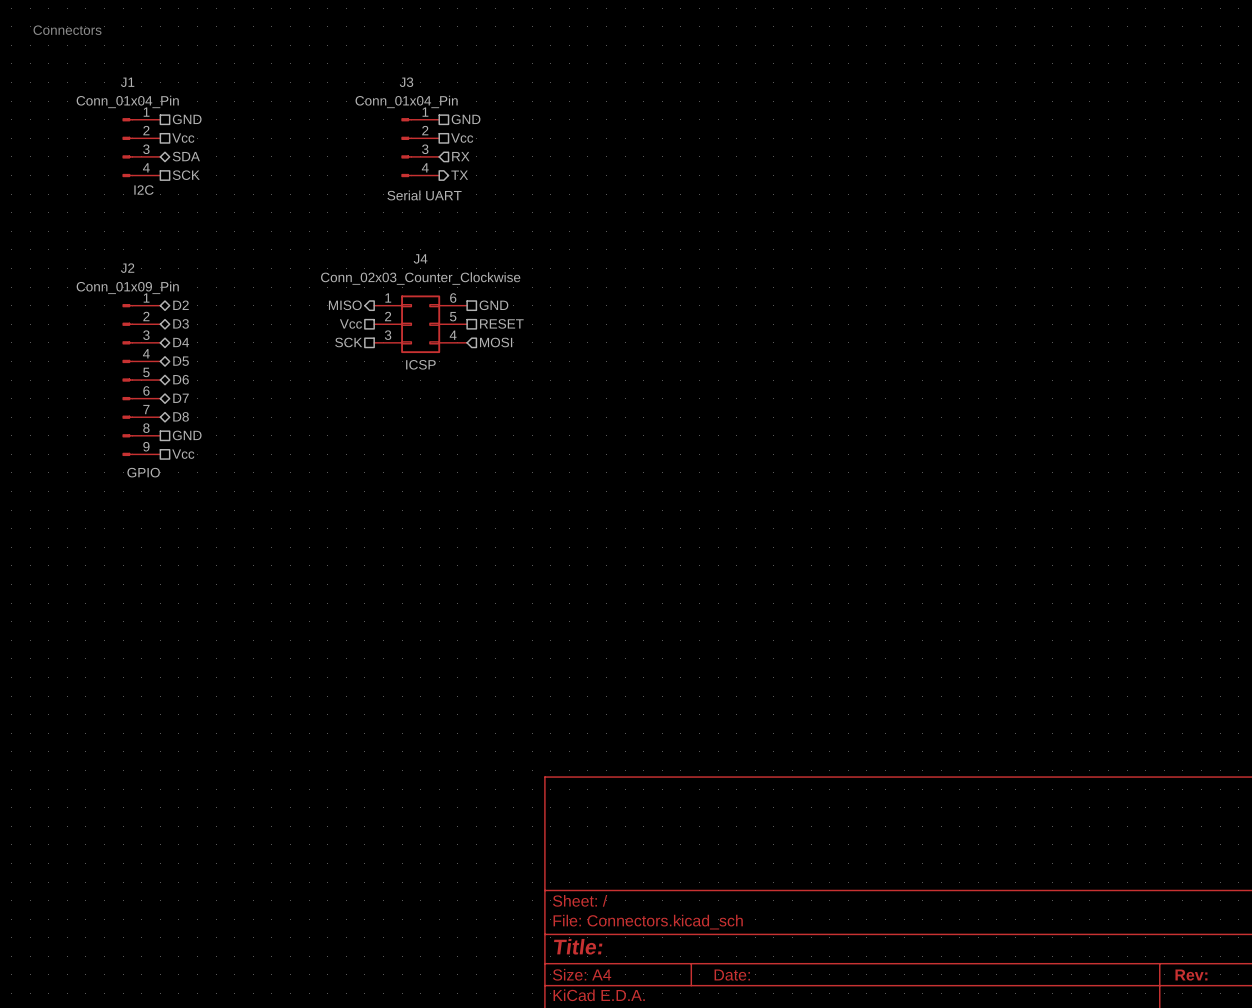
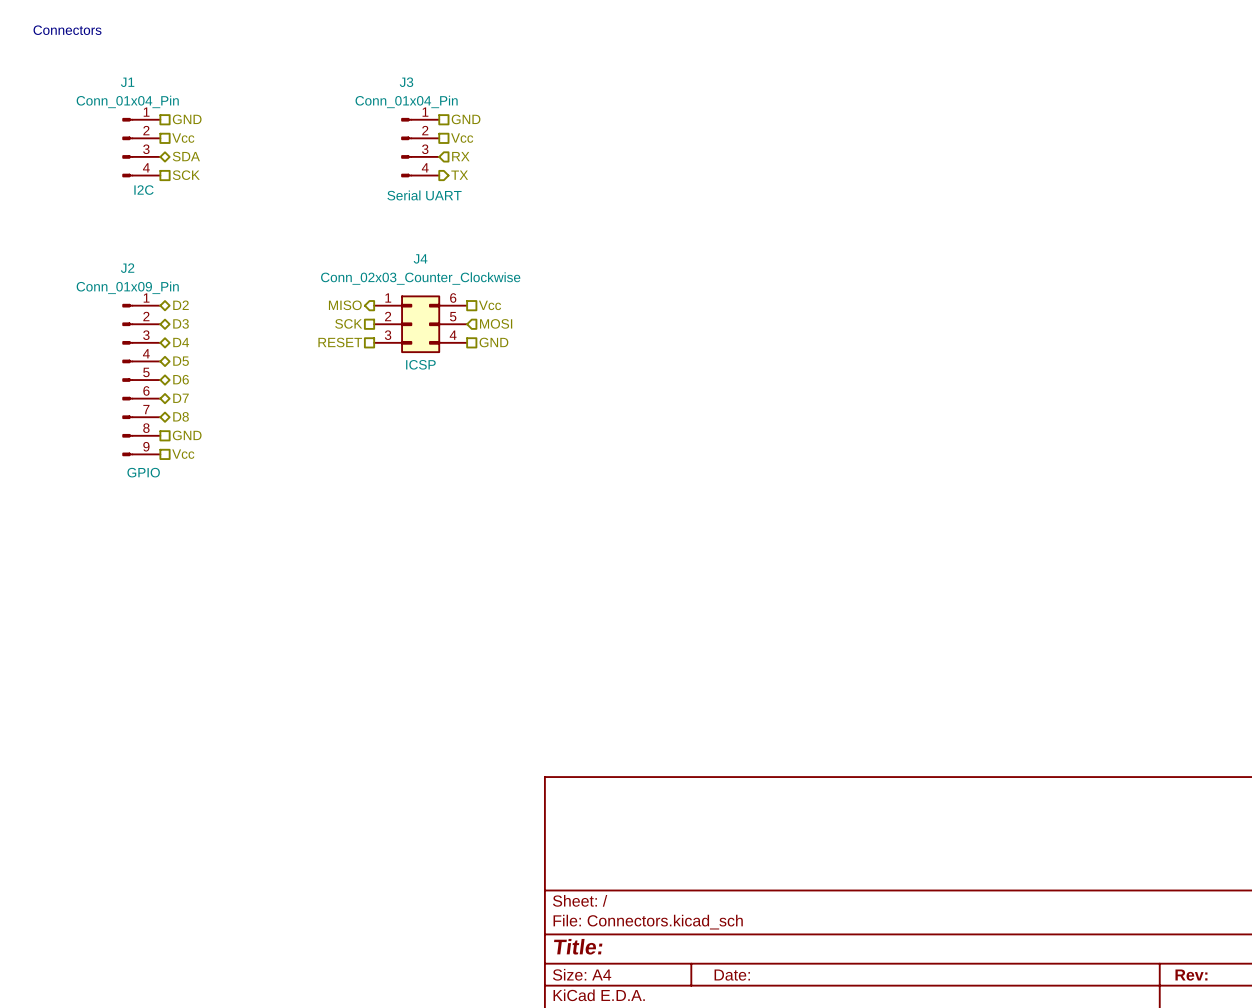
hierarchical label: GND (493, 305) -> Vcc (490, 305)
hierarchical label: Vcc (350, 323) -> SCK (348, 323)
hierarchical label shape: passive (501, 323) -> input (496, 323)
hierarchical label: RESET (501, 323) -> MOSI (496, 323)
hierarchical label: SCK (348, 342) -> RESET (340, 342)
hierarchical label shape: input (496, 342) -> passive (493, 342)
hierarchical label: MOSI (496, 342) -> GND (493, 342)

